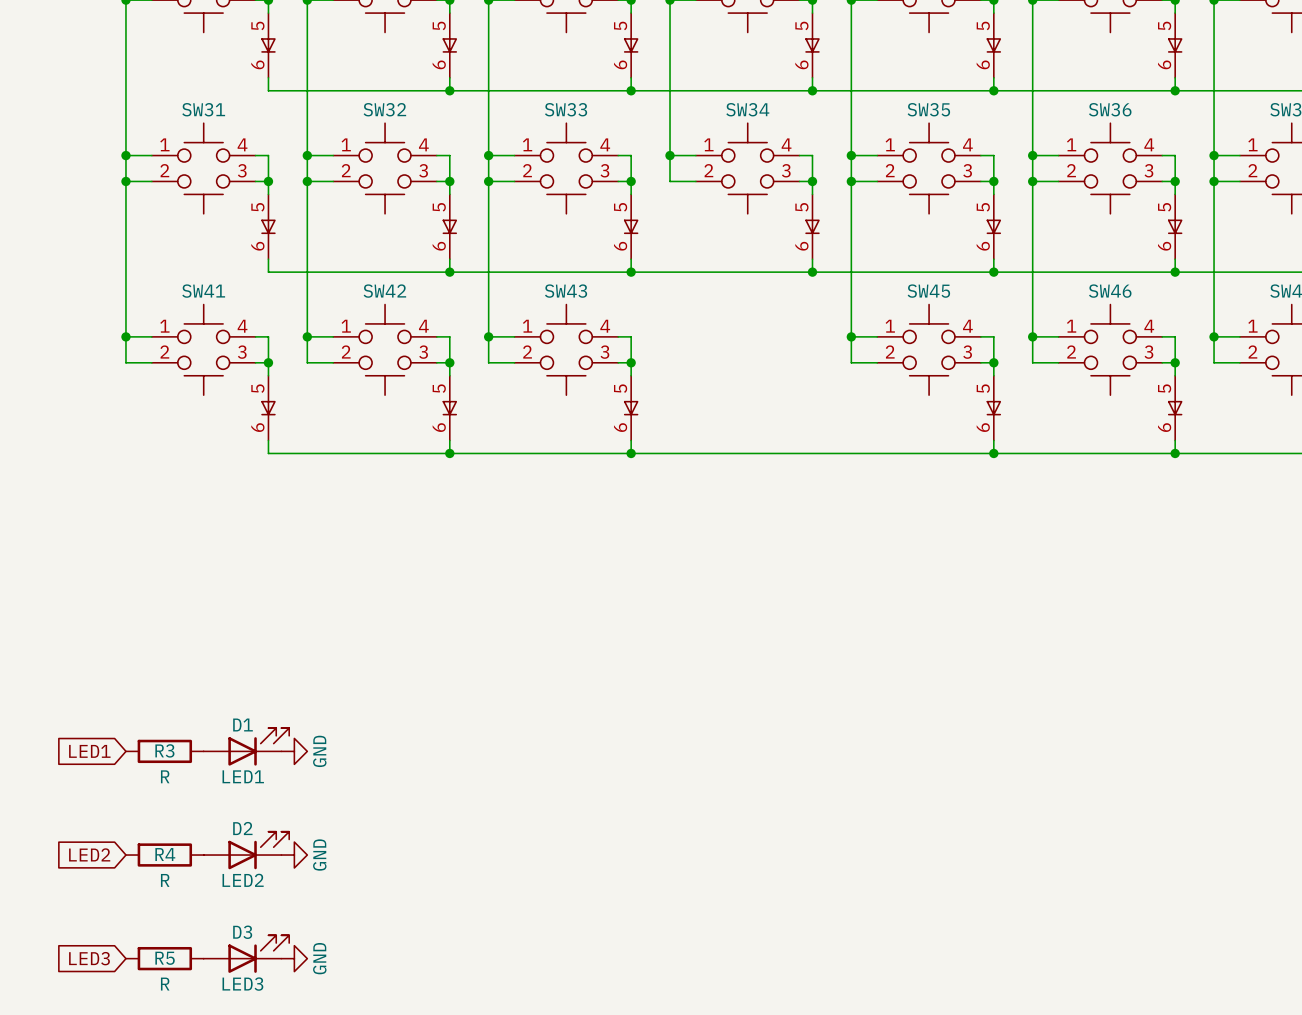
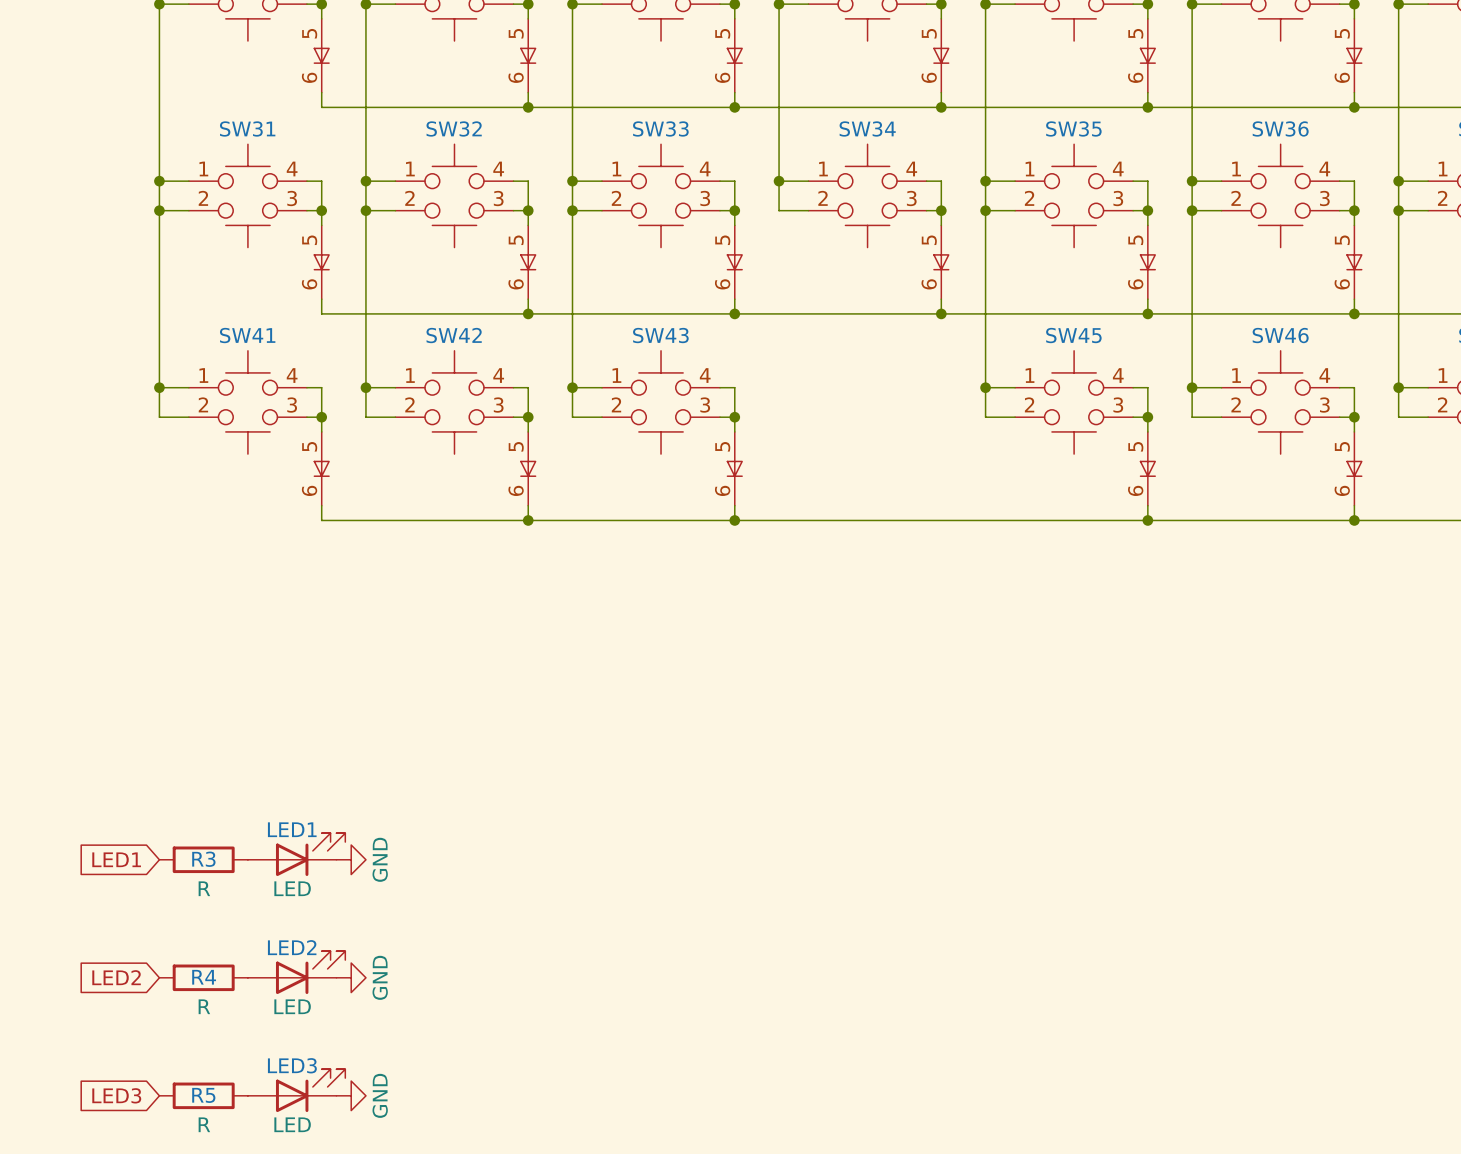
D1 name: D1 (243, 725) -> LED1 (292, 829)
D1 value: LED1 (243, 776) -> LED (292, 888)
D2 name: D2 (242, 828) -> LED2 (292, 947)
D2 value: LED2 (243, 880) -> LED (292, 1006)
D3 name: D3 (242, 932) -> LED3 (292, 1065)
D3 value: LED3 (242, 984) -> LED (292, 1124)

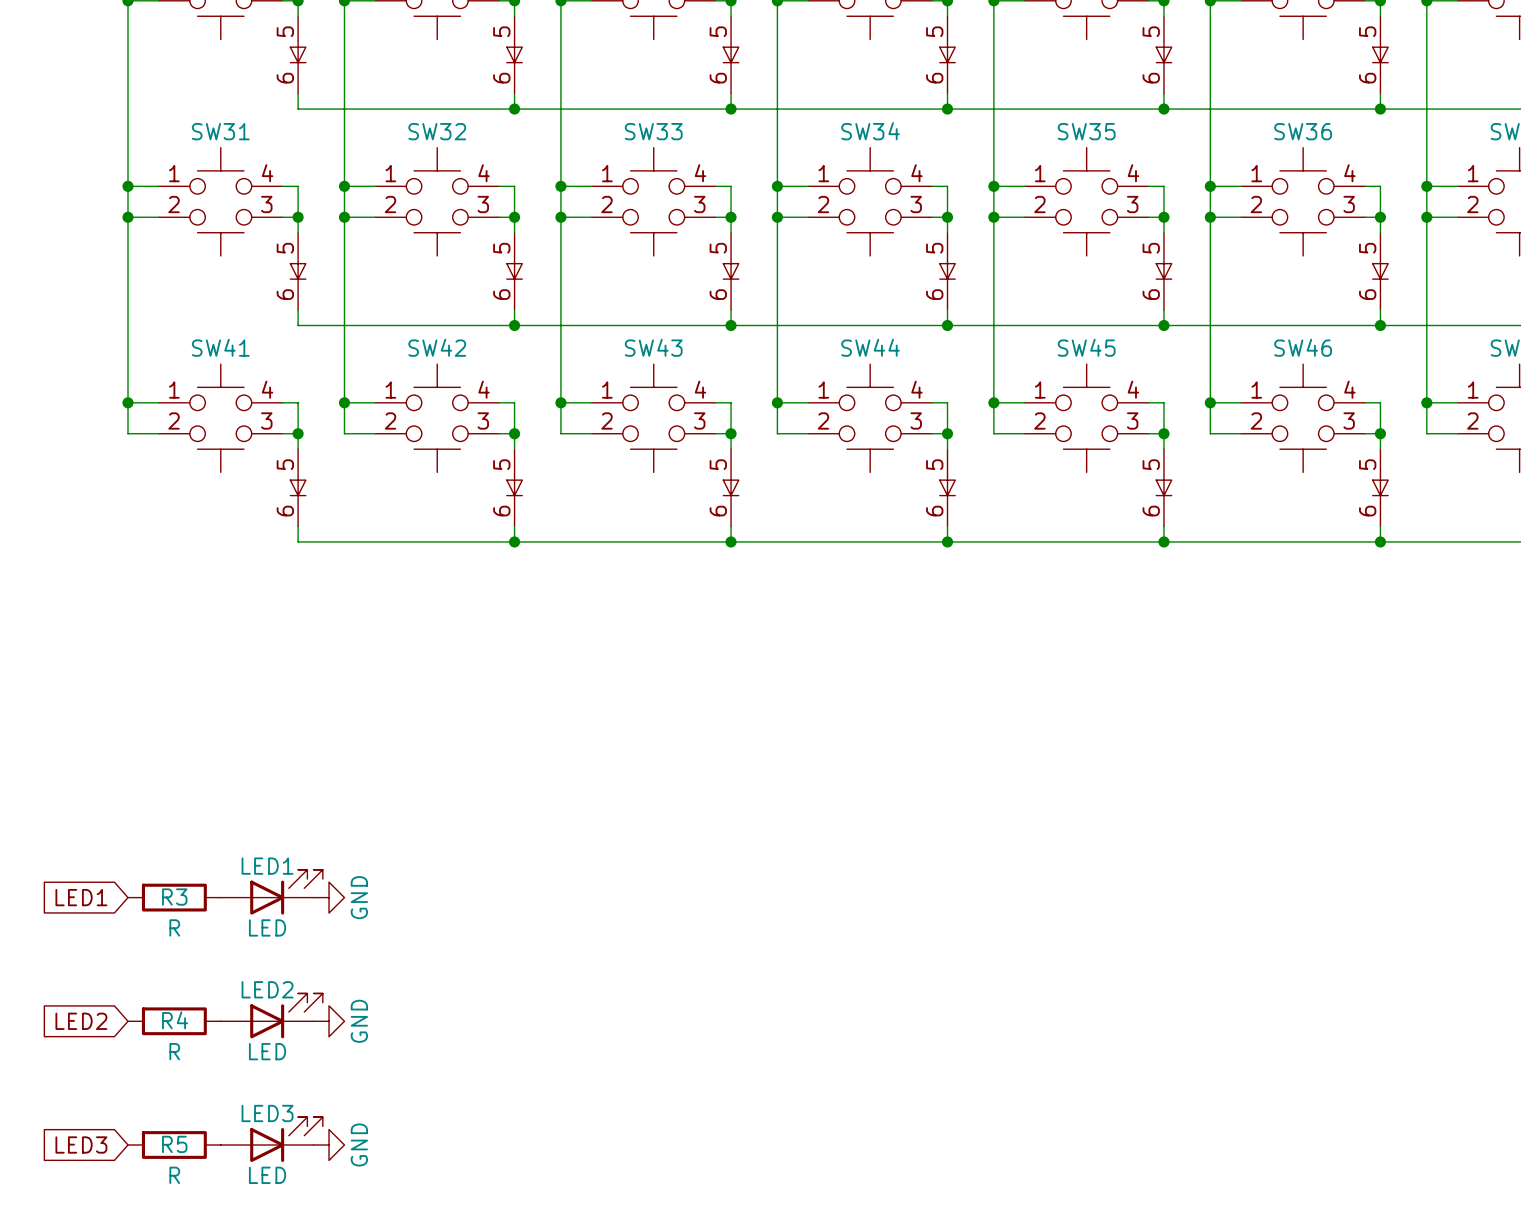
wire: none -> (777, 217) (777, 433) (808, 433)
junction: none -> (777, 217)
wire: none -> (777, 402) (808, 402)
junction: none -> (777, 402)
wire: none -> (932, 402) (947, 402) (947, 449)
wire: none -> (932, 433) (947, 433)
junction: none -> (947, 433)
SW44: none -> (881, 445)
wire: none -> (947, 526) (947, 541)
junction: none -> (947, 541)

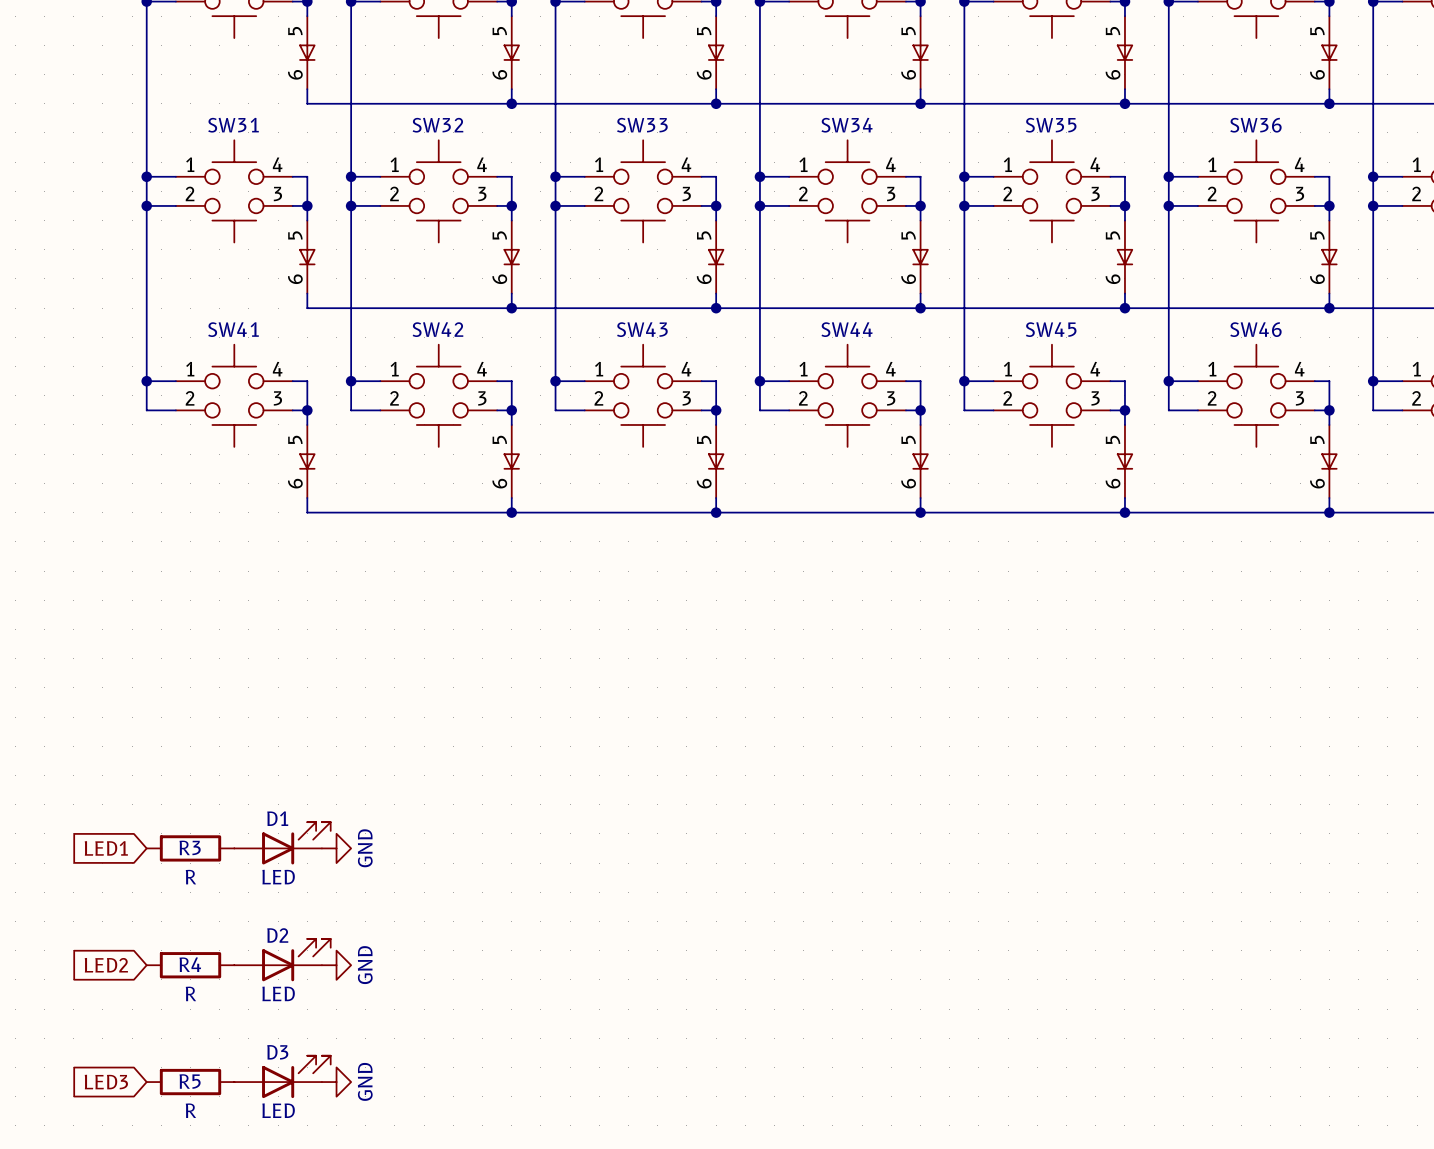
LED1 name: LED1 (267, 866) -> D1 (277, 818)
LED2 name: LED2 (267, 989) -> D2 (277, 935)
LED3 name: LED3 (267, 1113) -> D3 (277, 1052)

